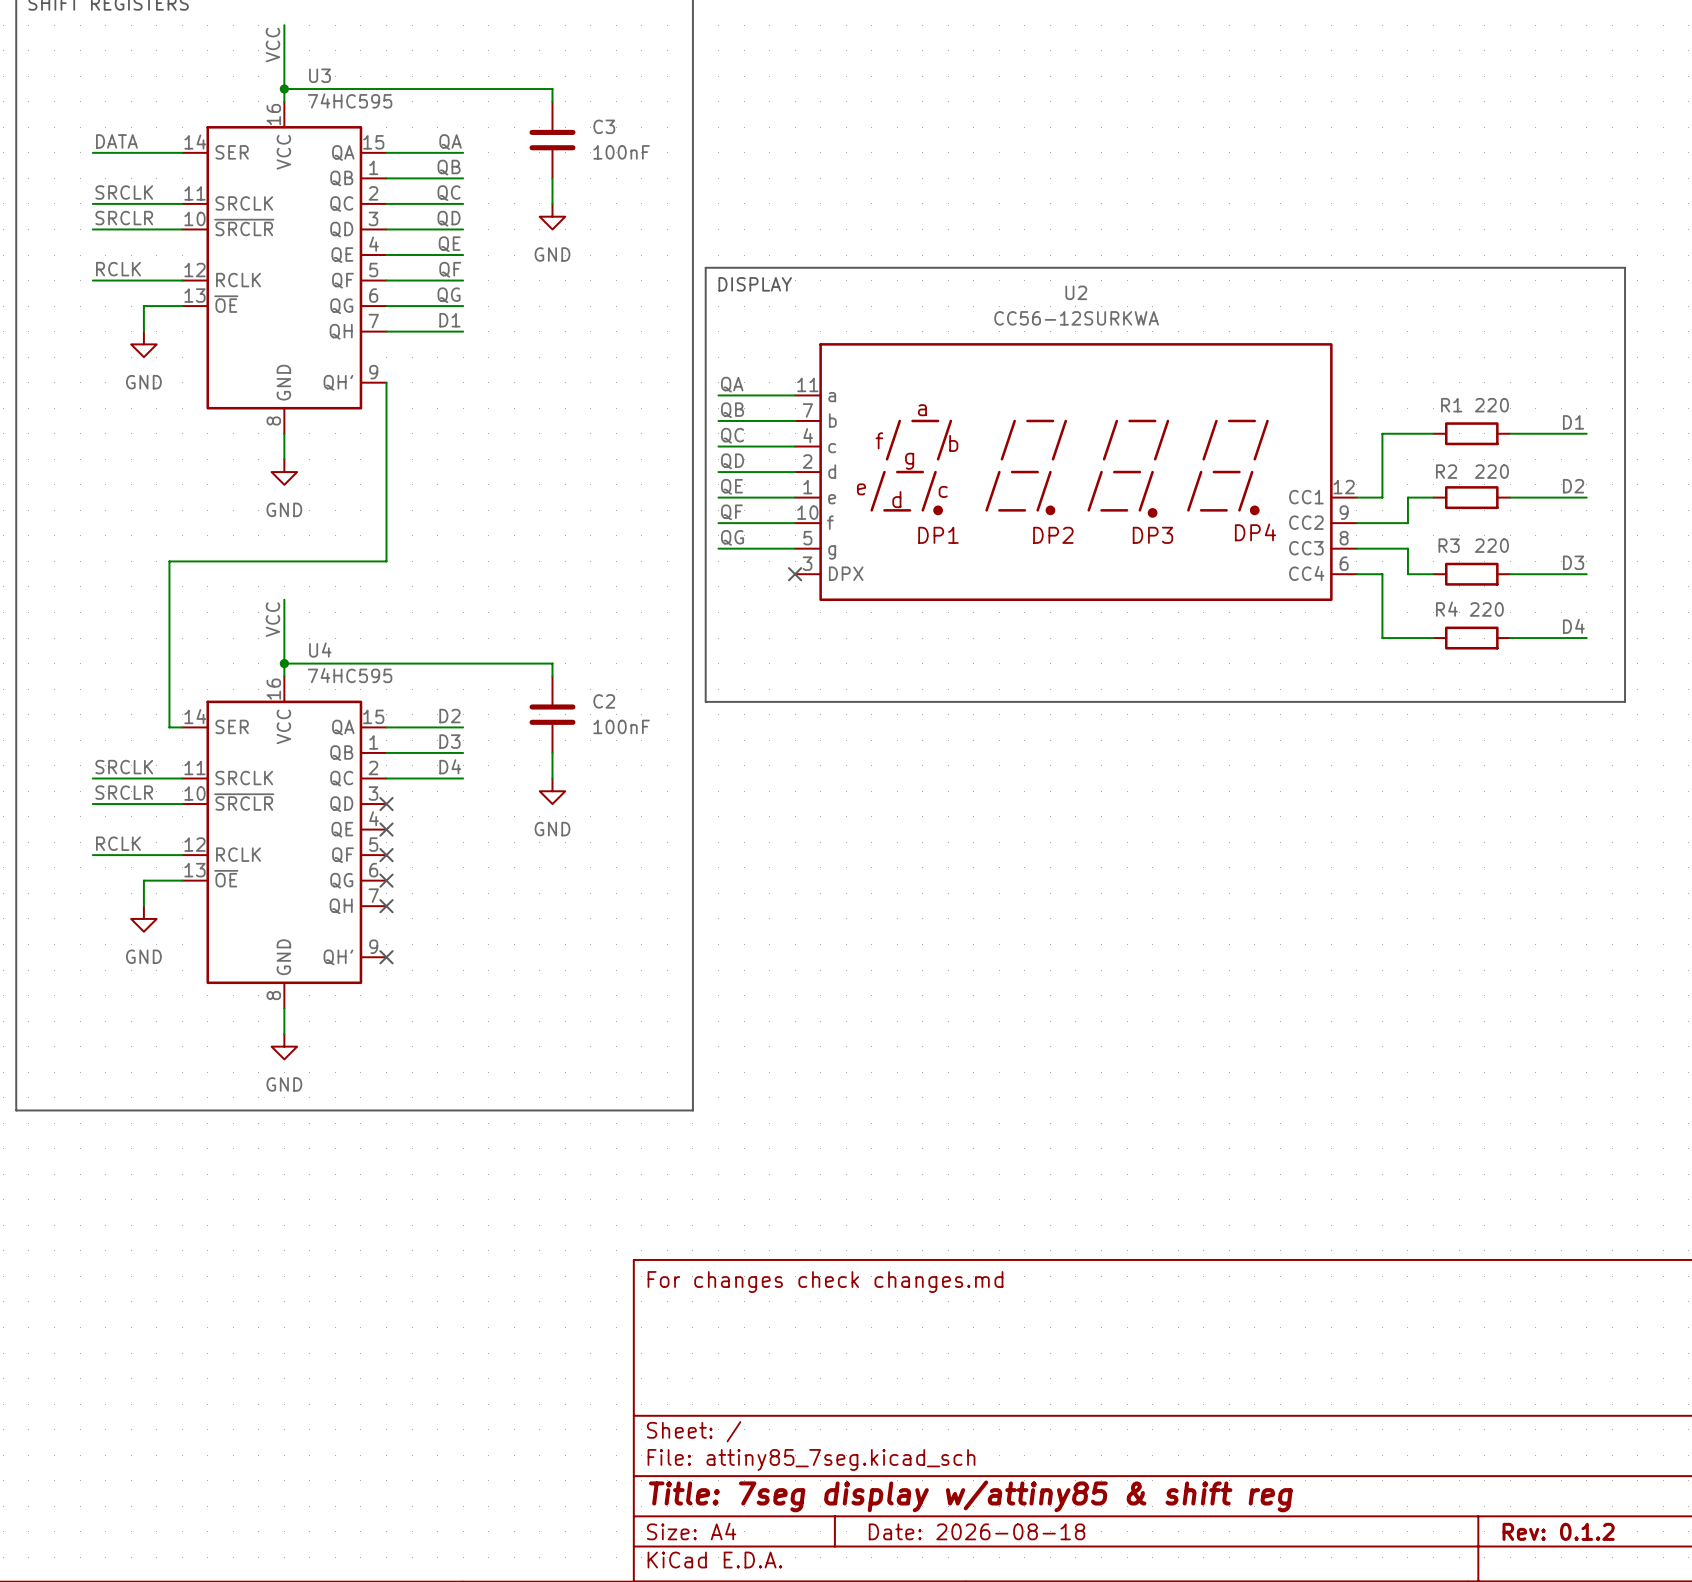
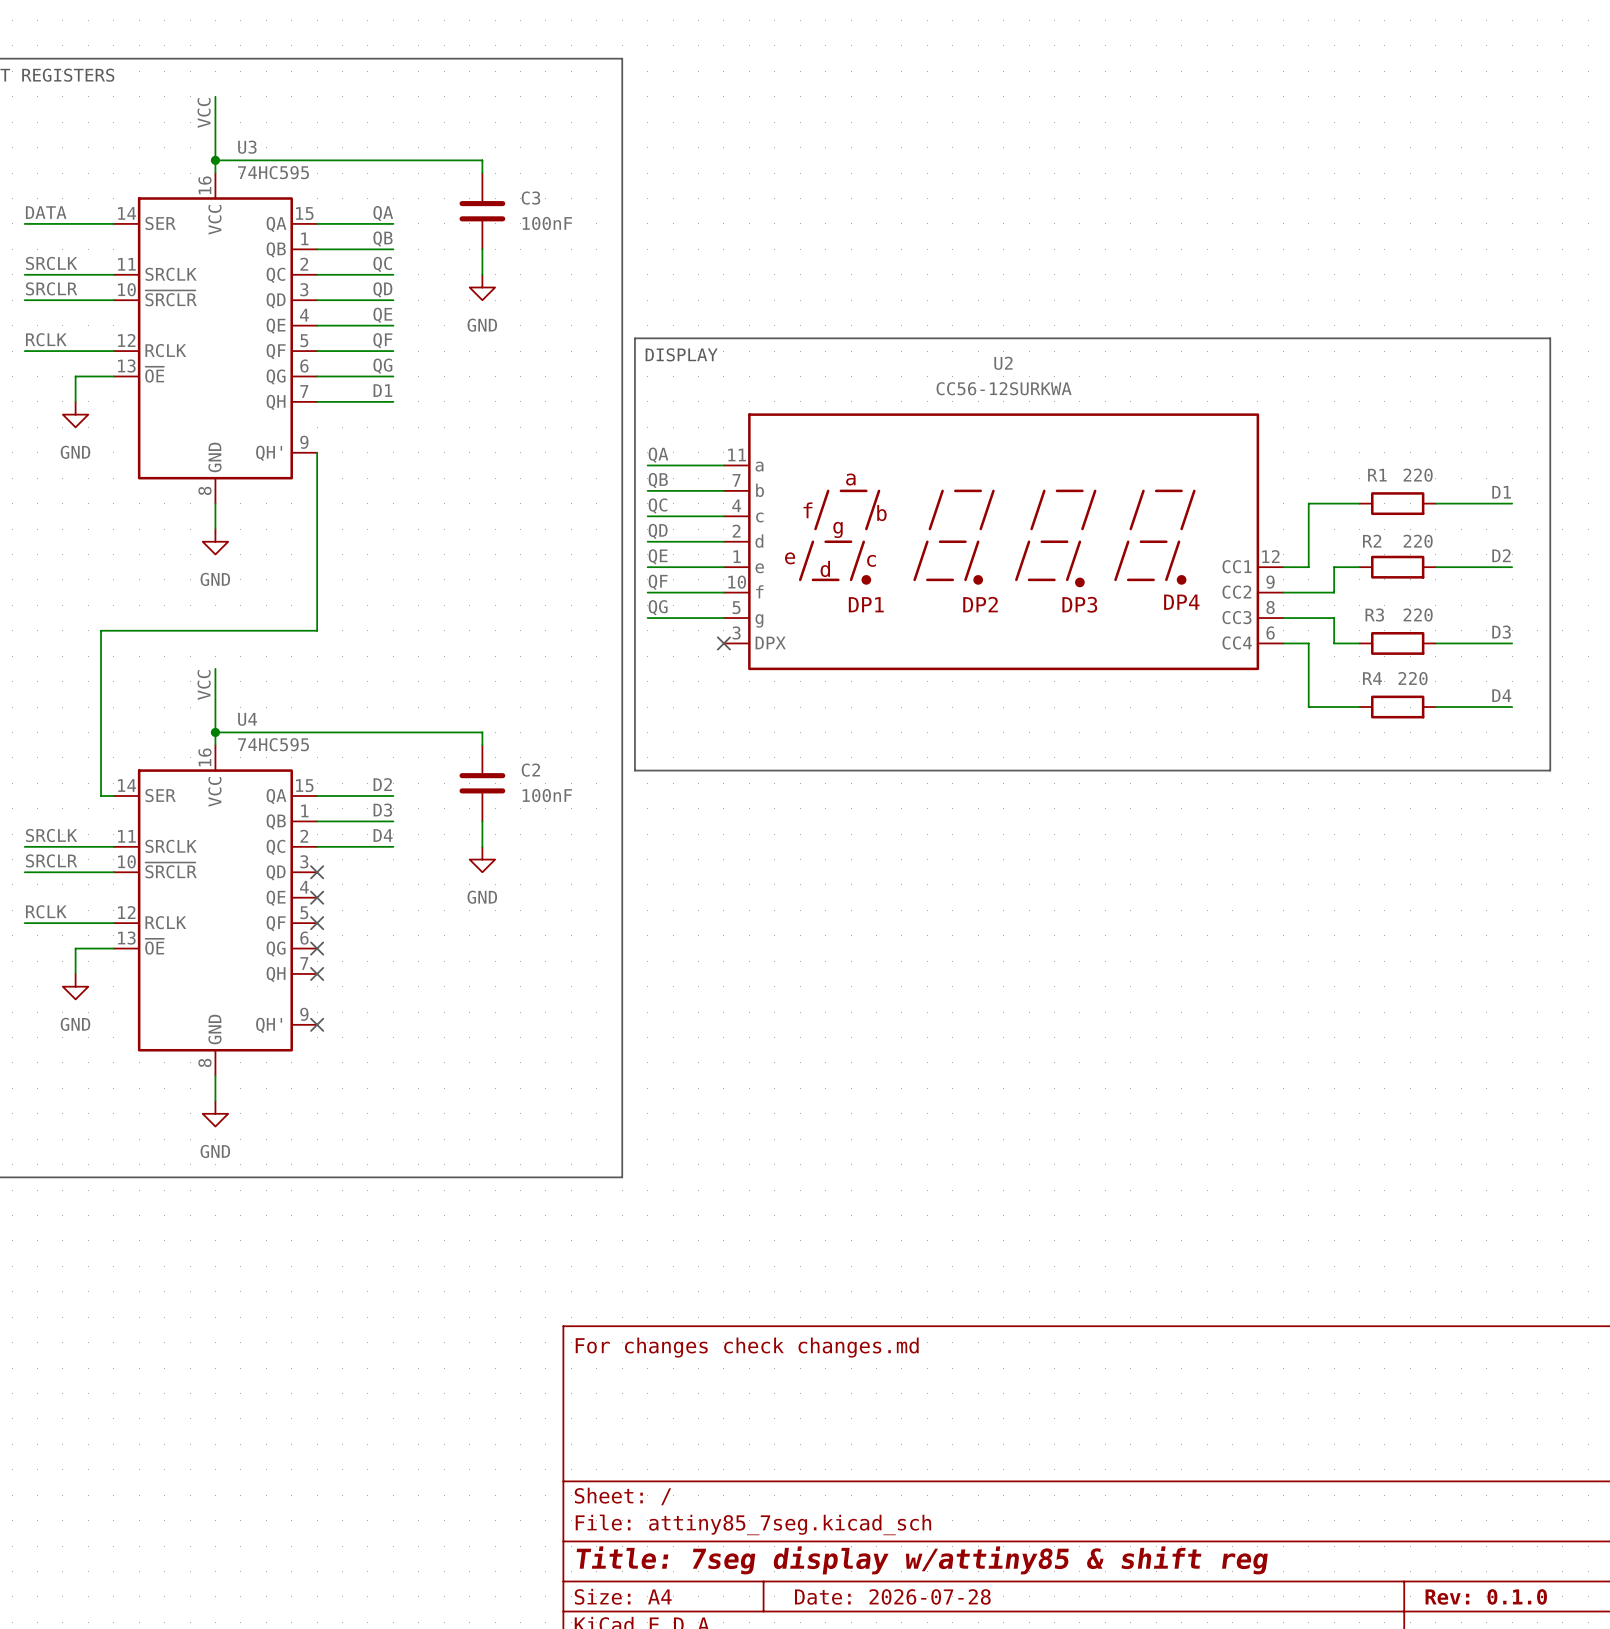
title block: Date: 2026-08-18 (977, 1531) -> Date: 2026-07-28 (892, 1596)
title block: Rev: 0.1.2 (1558, 1531) -> Rev: 0.1.0 (1486, 1596)

